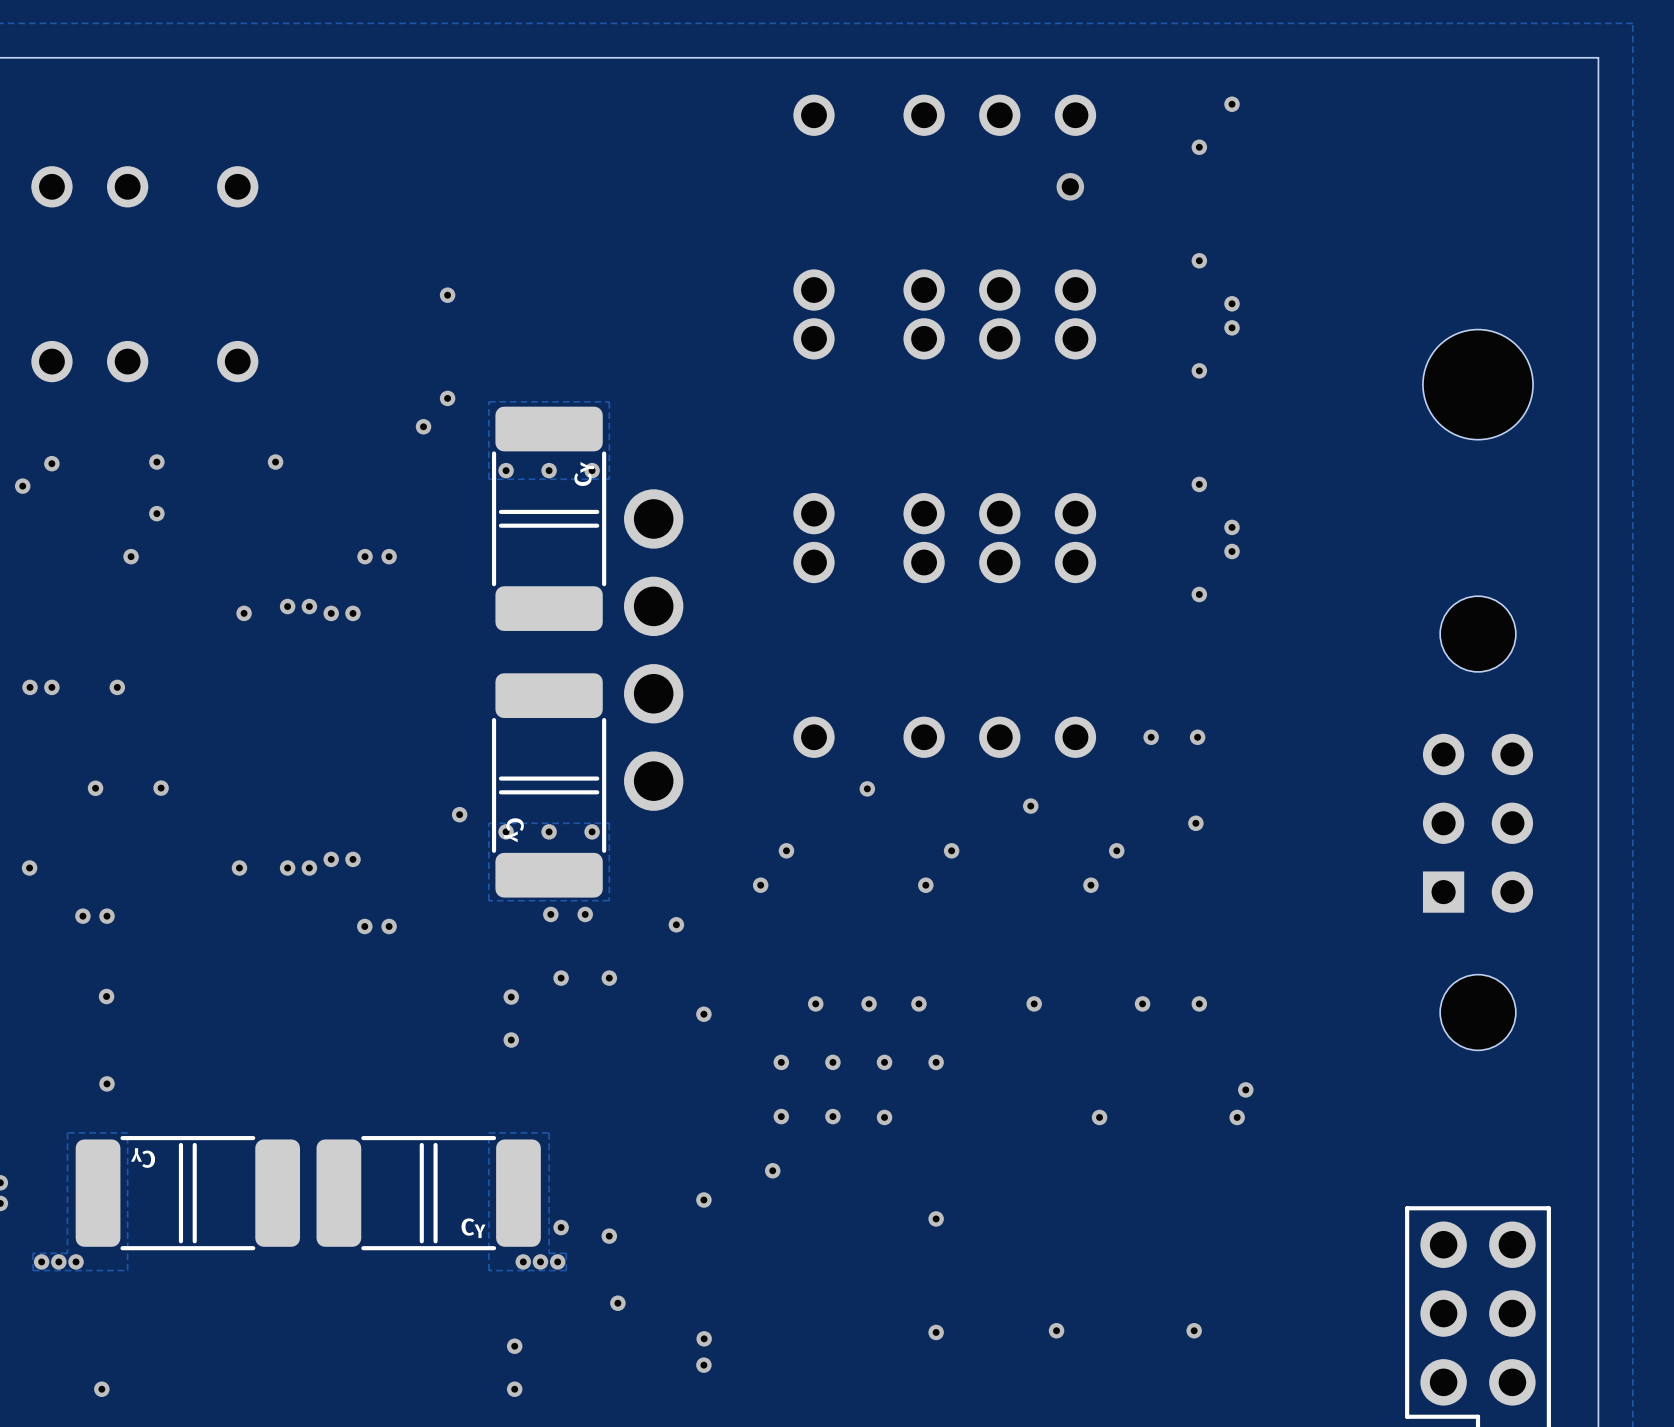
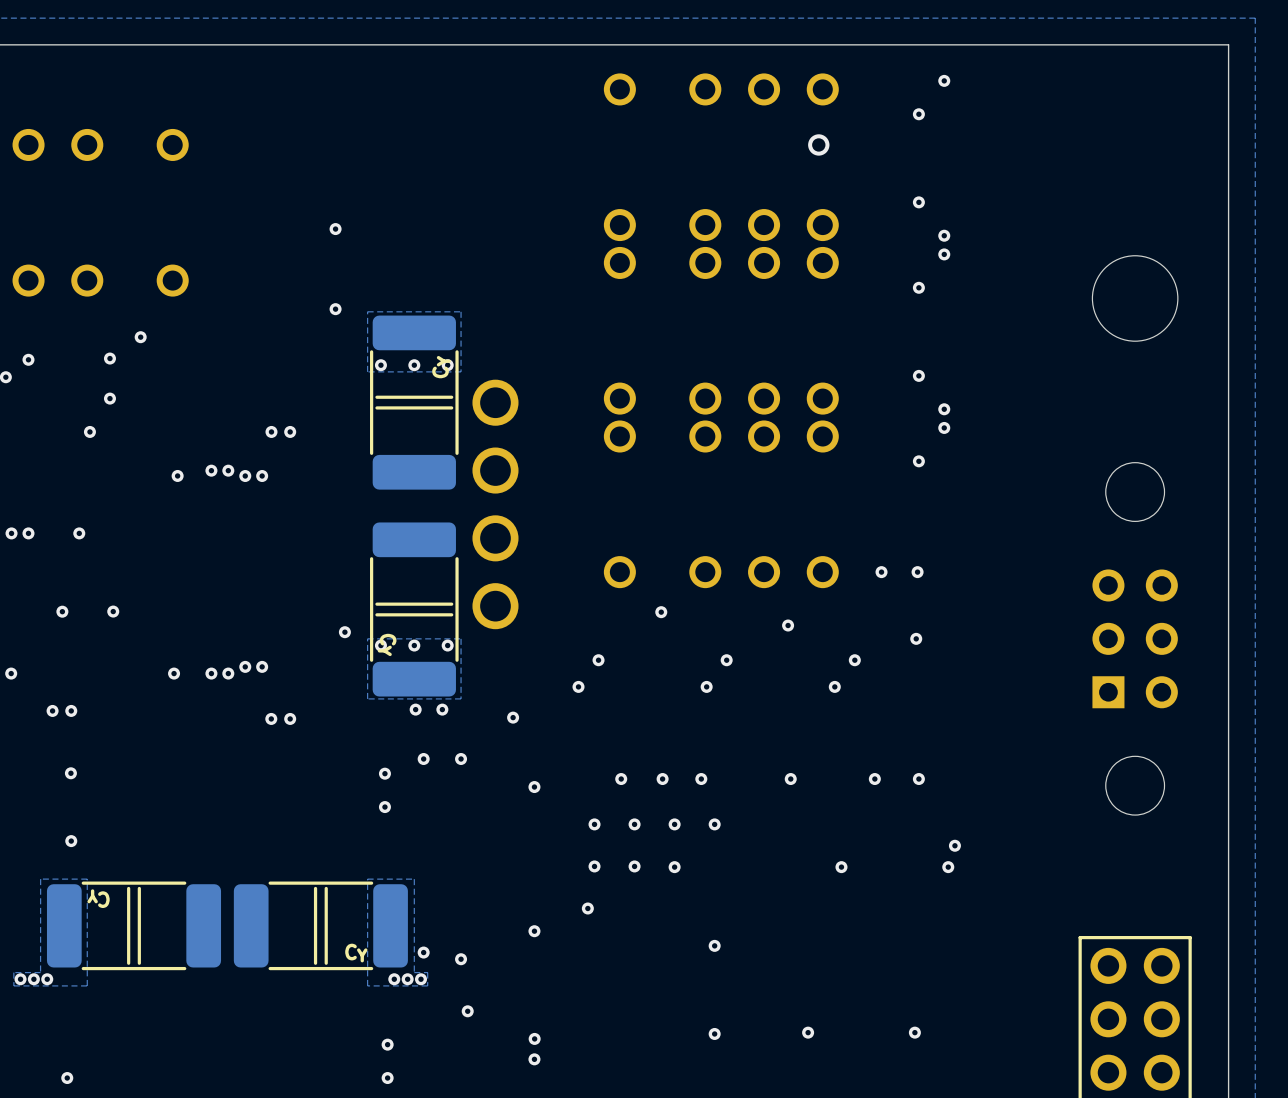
via: (423, 426) -> none
via position: (275, 462) -> (140, 337)

